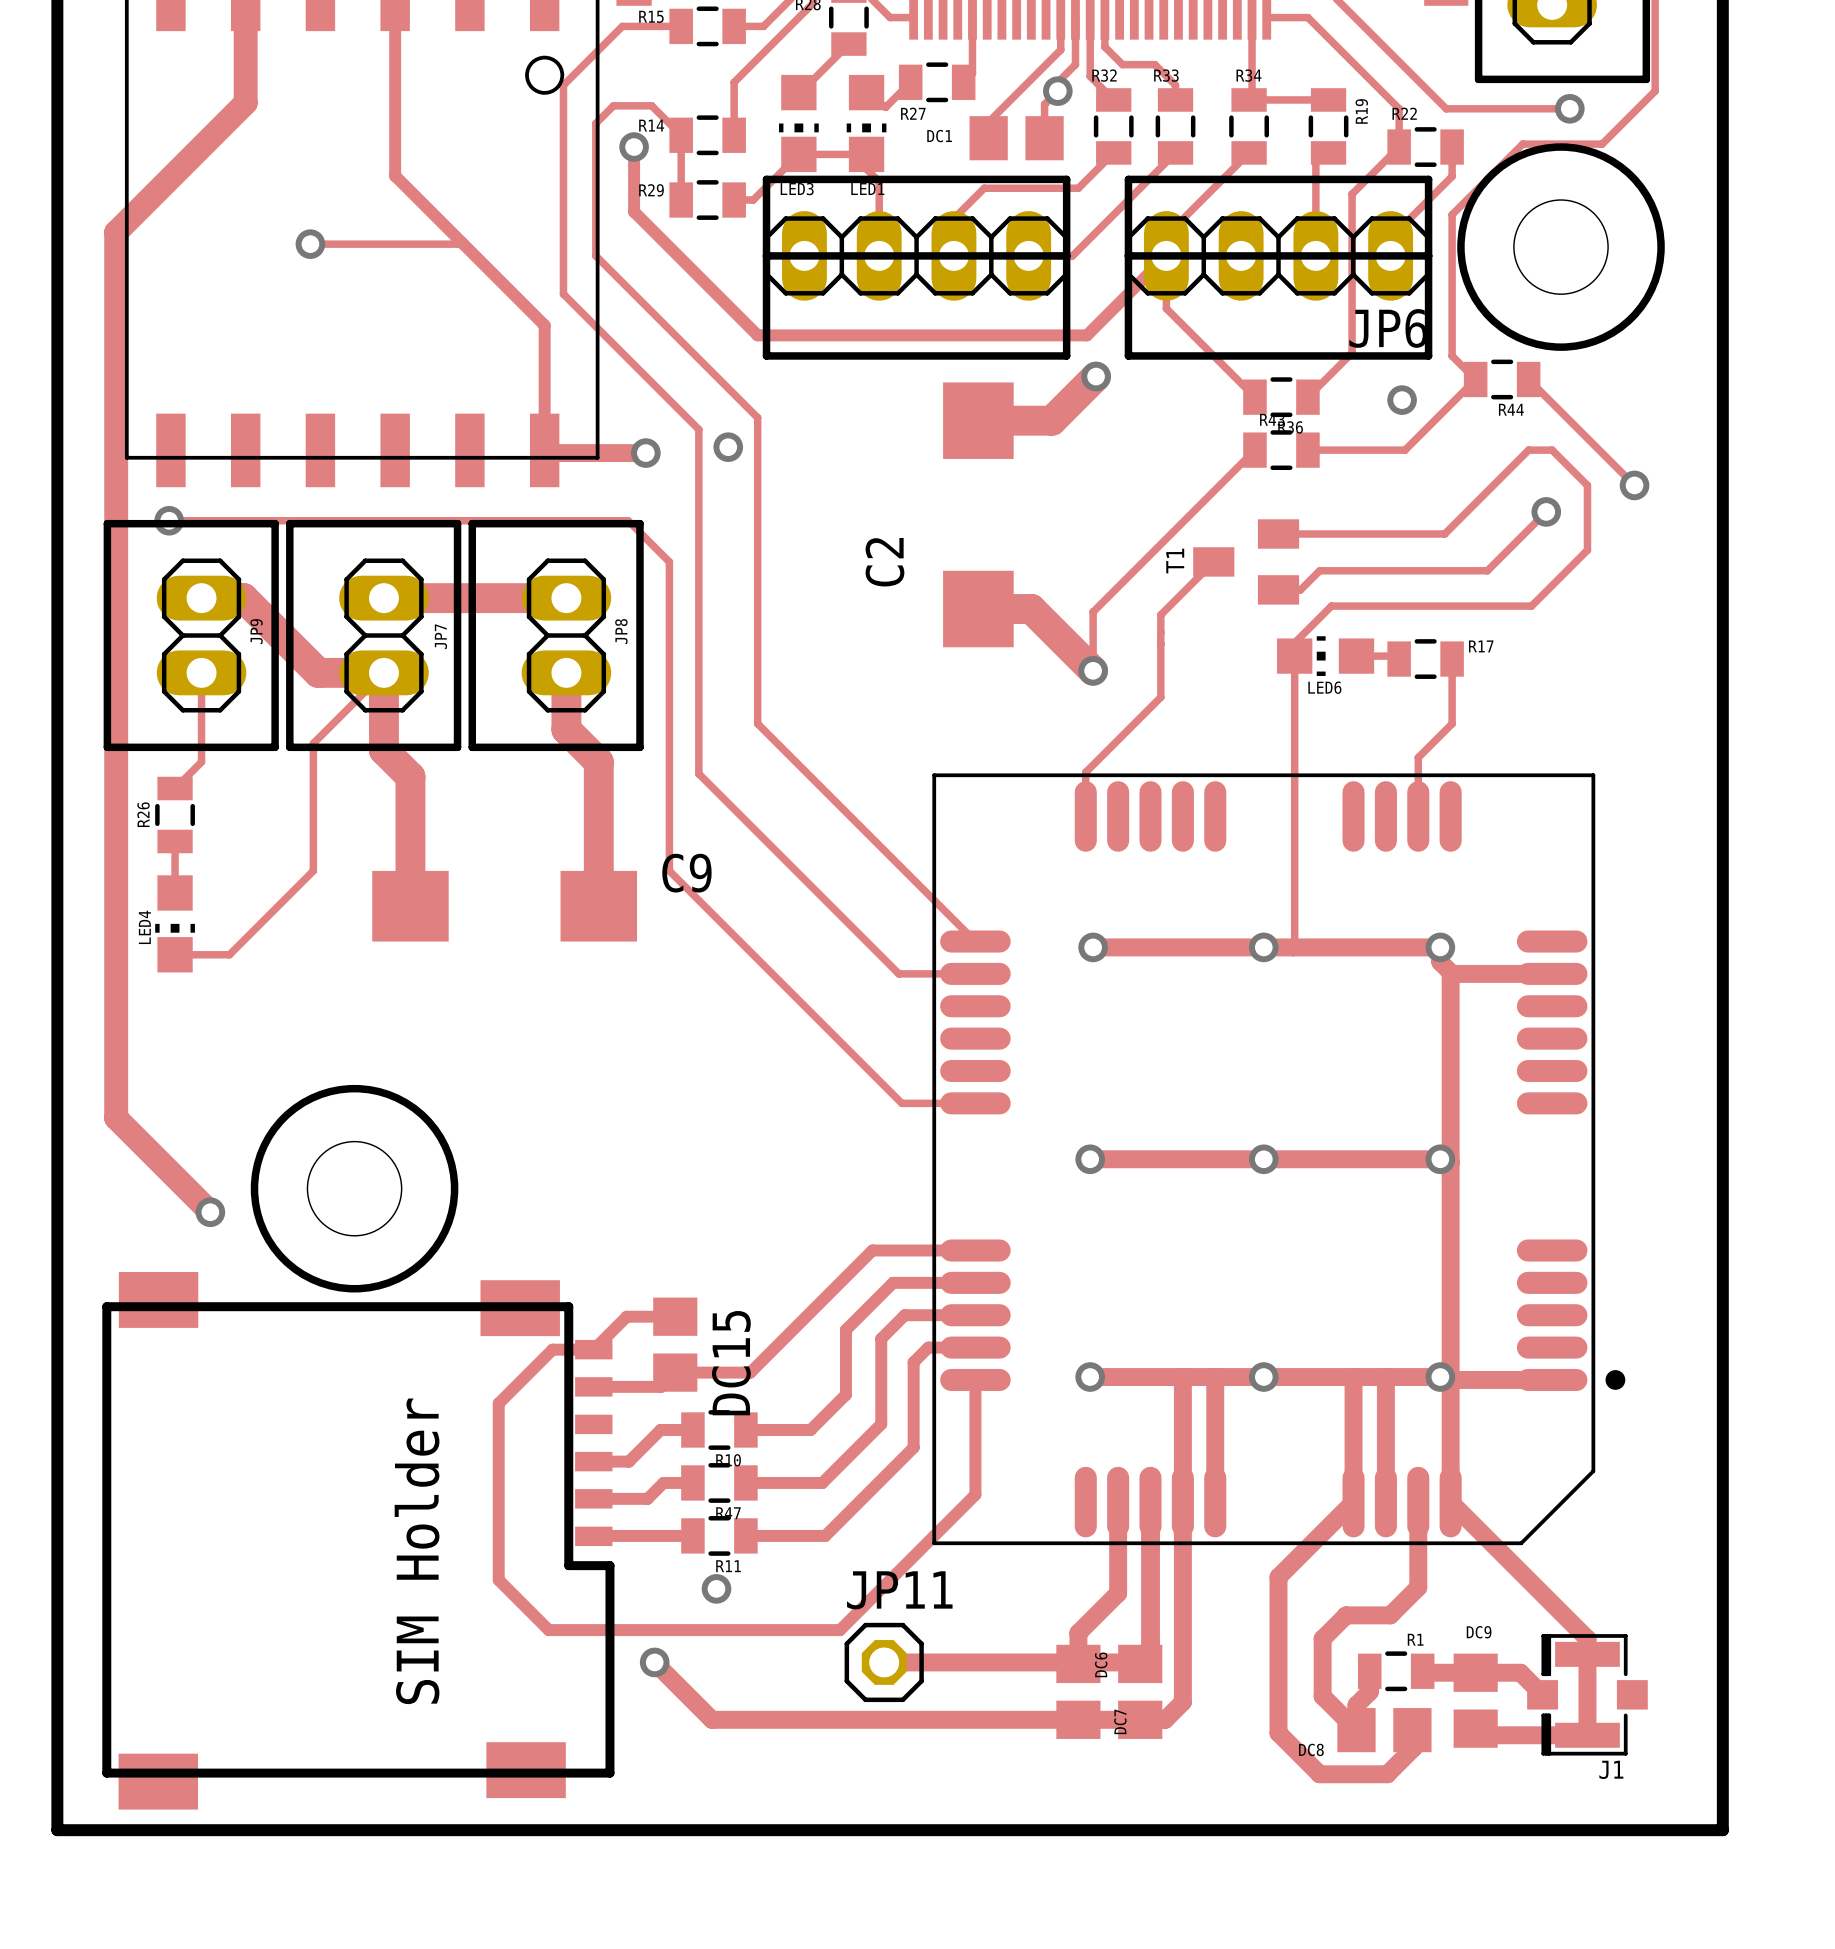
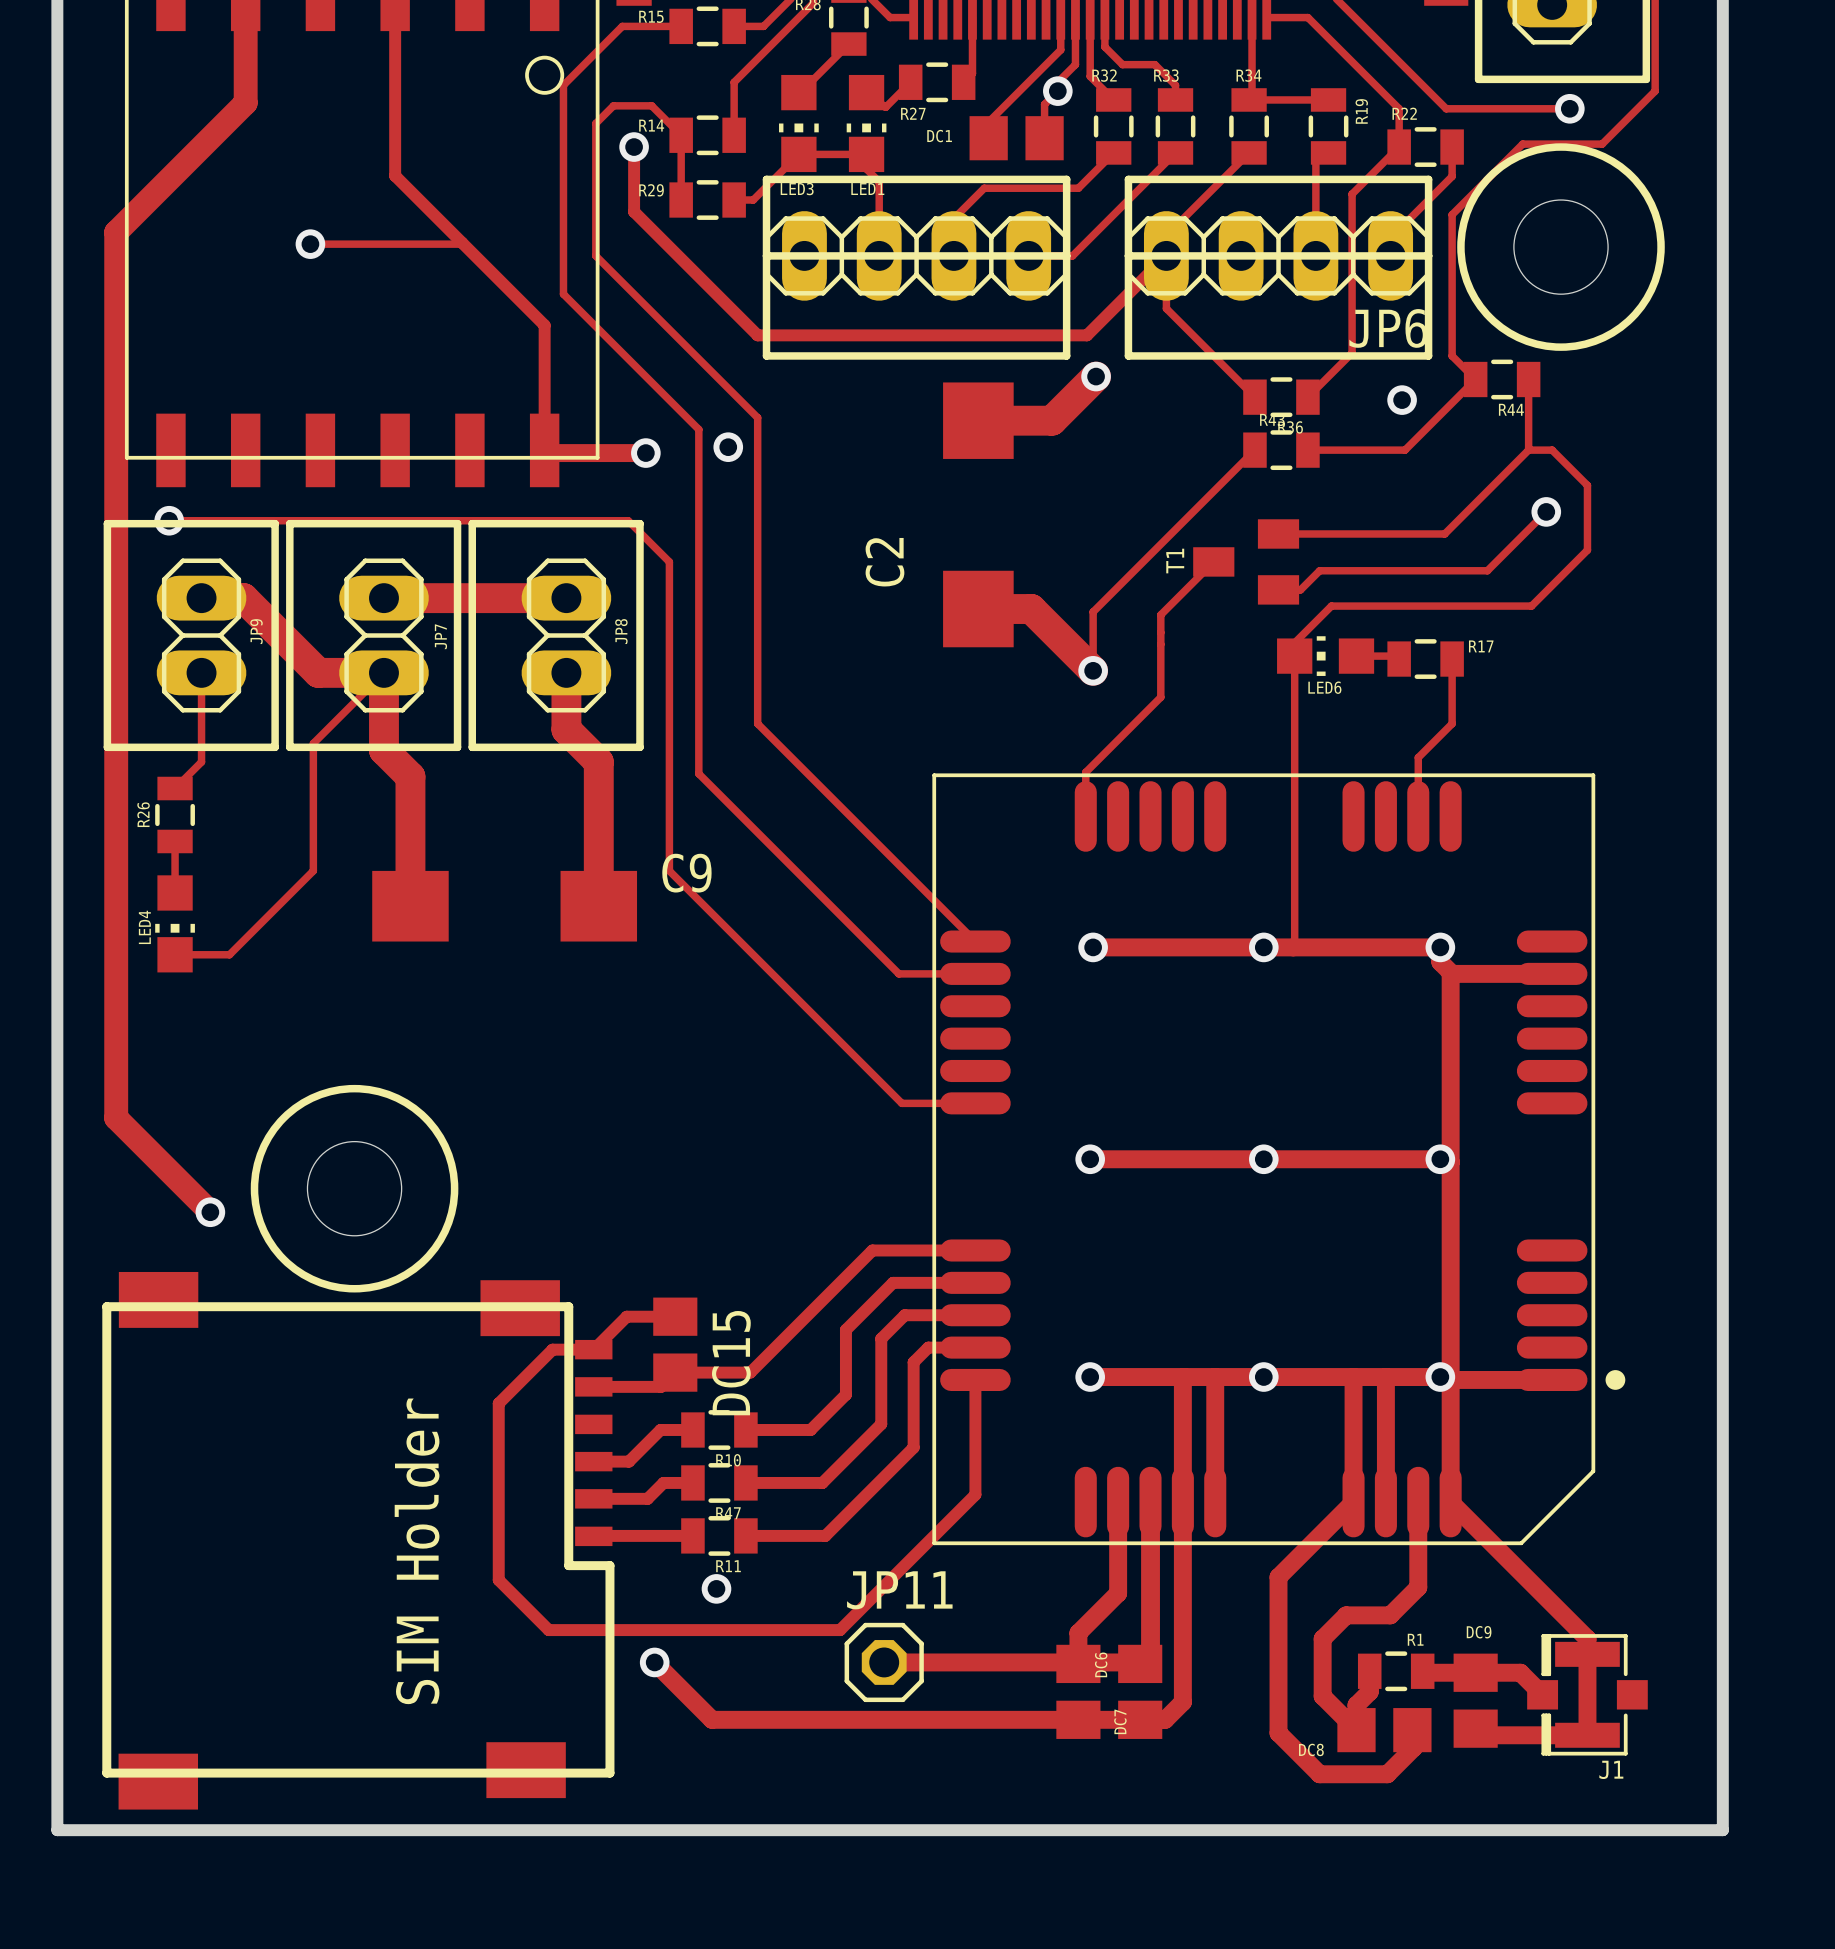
track: (1528, 379) (1634, 485) -> (1528, 379) (1528, 450)
via: (1634, 485) -> none

